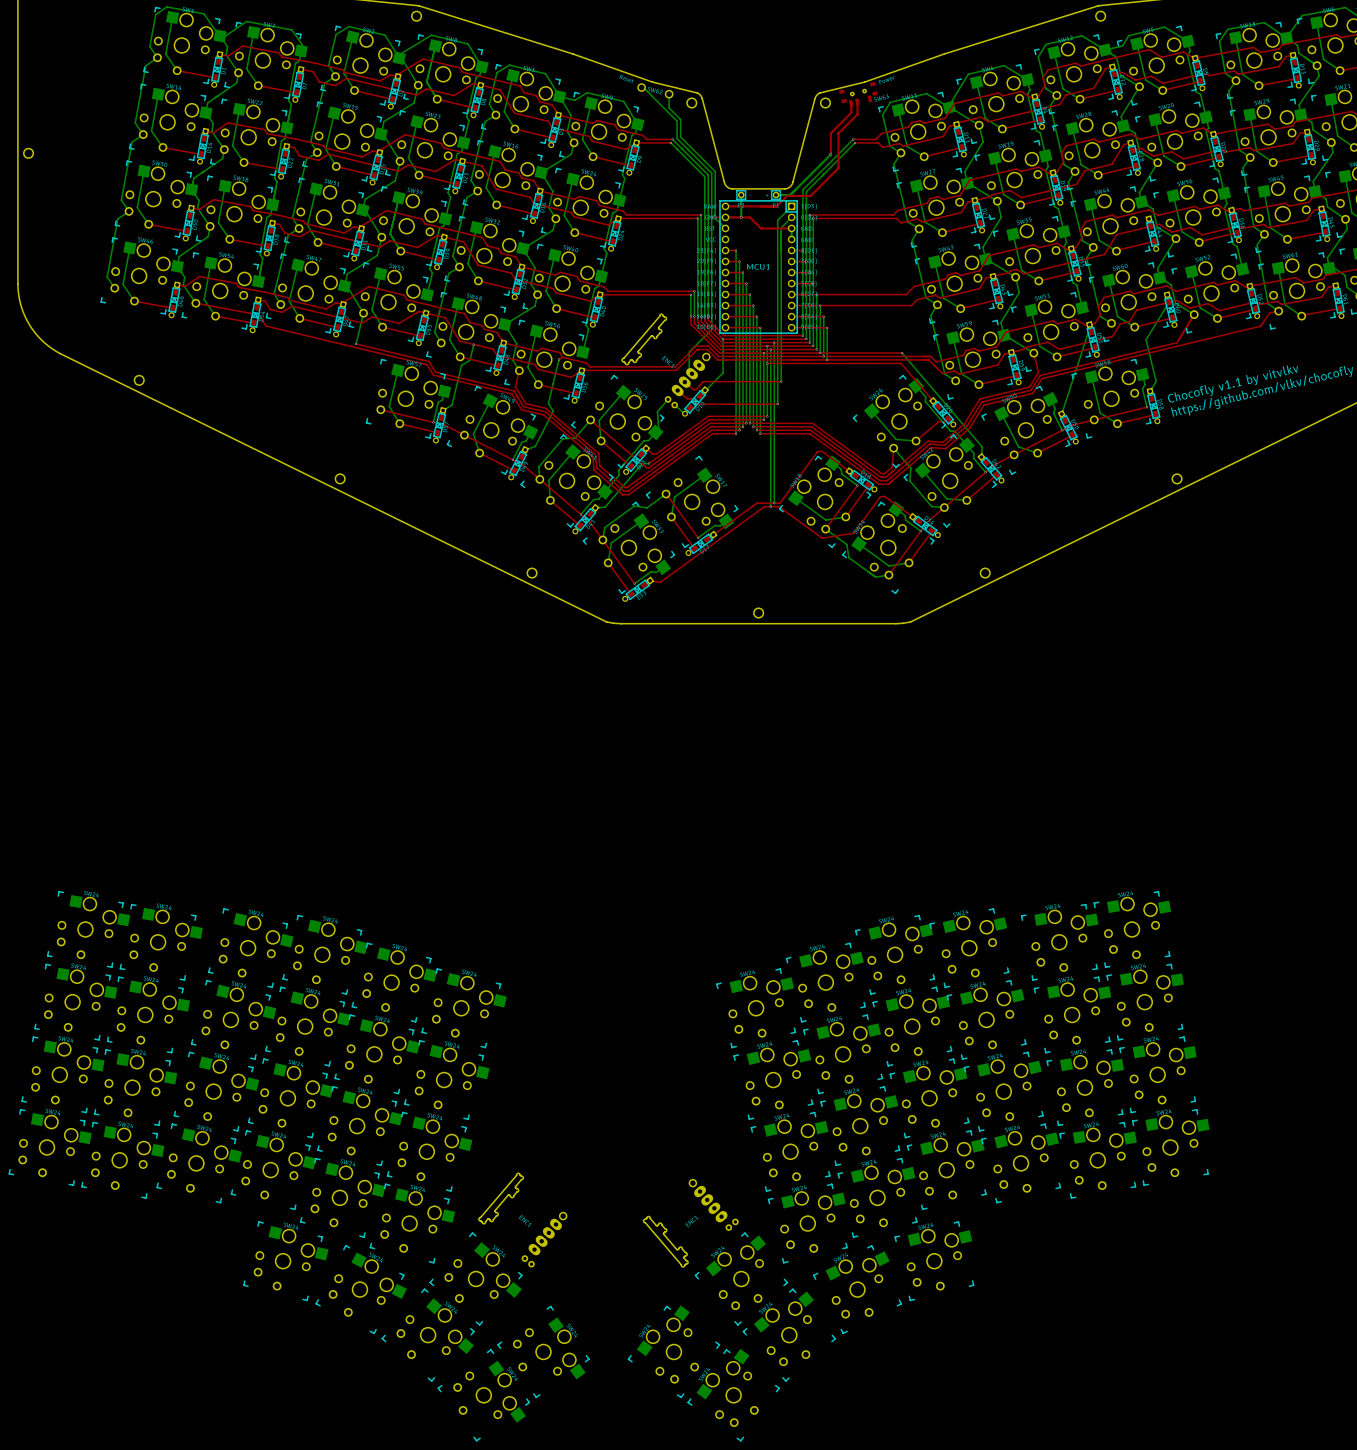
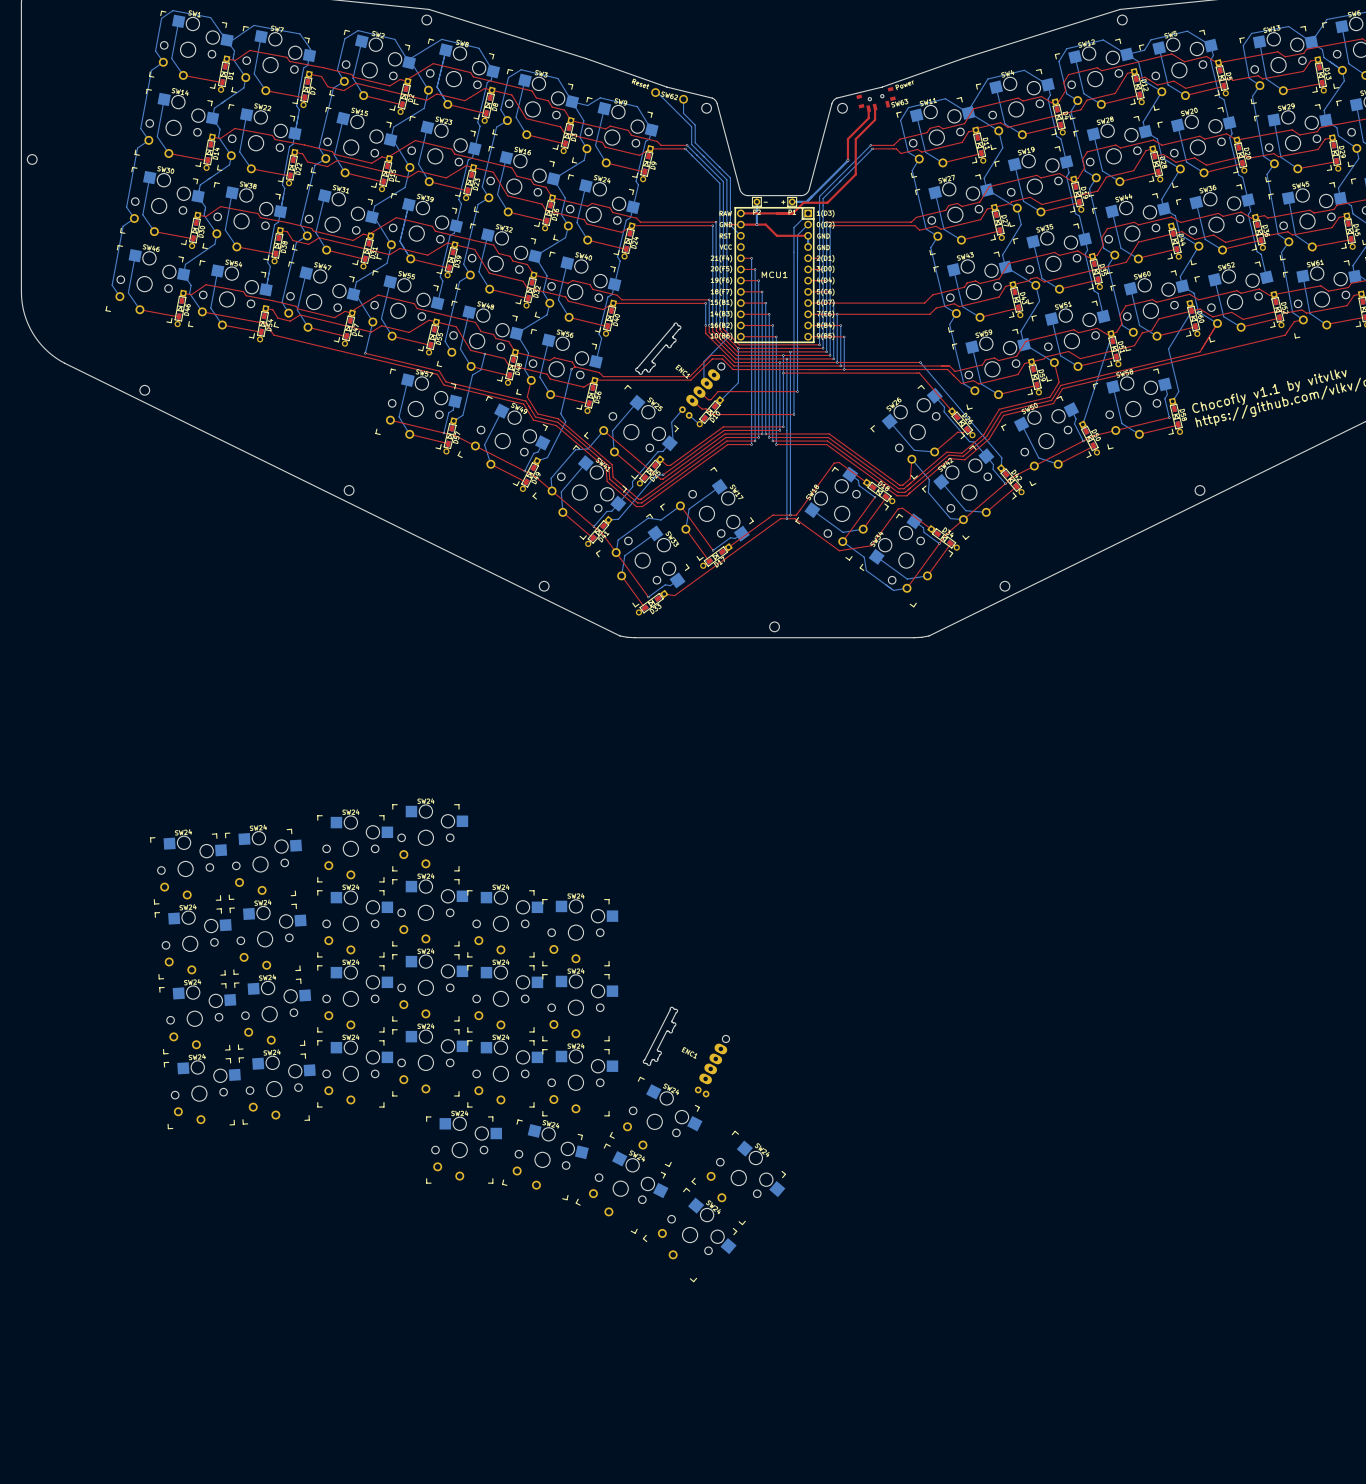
part: none -> (430, 837)
part: none -> (355, 848)
part: none -> (263, 864)
part: none -> (188, 868)
part: none -> (430, 912)
part: none -> (355, 923)
part: none -> (505, 923)
part: none -> (580, 932)
part: none -> (268, 939)
part: none -> (193, 943)
part: (88, 929) -> none
part: (1132, 929) -> none
part: (161, 942) -> none
part: (1059, 942) -> none
part: (251, 948) -> none
part: (969, 948) -> none
part: (325, 954) -> none
part: (895, 954) -> none
part: none -> (430, 987)
part: none -> (355, 998)
part: none -> (505, 998)
part: (394, 982) -> none
part: (825, 982) -> none
part: none -> (580, 1007)
part: none -> (272, 1014)
part: none -> (197, 1018)
part: (75, 1002) -> none
part: (1145, 1002) -> none
part: (464, 1008) -> none
part: (756, 1008) -> none
part: (148, 1014) -> none
part: (1072, 1014) -> none
part: (233, 1019) -> none
part: (986, 1019) -> none
part: (308, 1026) -> none
part: (912, 1026) -> none
part: none -> (686, 1052)
part: none -> (430, 1062)
part: none -> (355, 1073)
part: none -> (505, 1073)
part: (377, 1054) -> none
part: (843, 1054) -> none
part: none -> (580, 1082)
part: none -> (277, 1089)
part: none -> (202, 1093)
part: (63, 1074) -> none
part: (1158, 1074) -> none
part: (447, 1080) -> none
part: (773, 1080) -> none
part: (135, 1087) -> none
part: (1085, 1087) -> none
part: (216, 1091) -> none
part: (1003, 1091) -> none
part: (290, 1098) -> none
part: (929, 1098) -> none
part: none -> (656, 1121)
part: (360, 1126) -> none
part: (860, 1126) -> none
part: none -> (464, 1150)
part: none -> (545, 1159)
part: (50, 1147) -> none
part: (1170, 1147) -> none
part: (429, 1151) -> none
part: (790, 1151) -> none
part: none -> (738, 1177)
part: (123, 1160) -> none
part: (1098, 1160) -> none
part: (199, 1163) -> none
part: (1021, 1163) -> none
part: none -> (622, 1188)
part: (273, 1170) -> none
part: (946, 1170) -> none
part: (342, 1197) -> none
part: (877, 1197) -> none
part: none -> (690, 1235)
part: (522, 1220) -> none
part: (412, 1223) -> none
part: (691, 1223) -> none
part: (807, 1223) -> none
part: (286, 1261) -> none
part: (934, 1261) -> none
part: (476, 1279) -> none
part: (741, 1279) -> none
part: (361, 1289) -> none
part: (857, 1289) -> none
part: (428, 1335) -> none
part: (789, 1335) -> none
part: (543, 1351) -> none
part: (673, 1351) -> none
part: (483, 1395) -> none
part: (733, 1395) -> none

